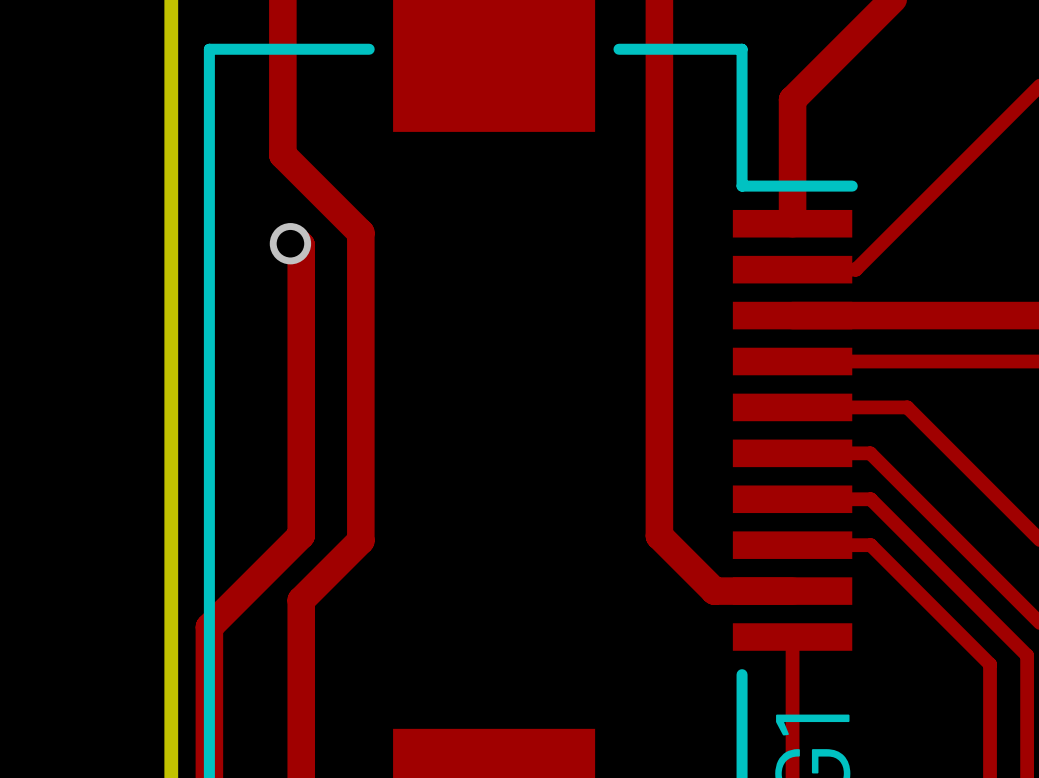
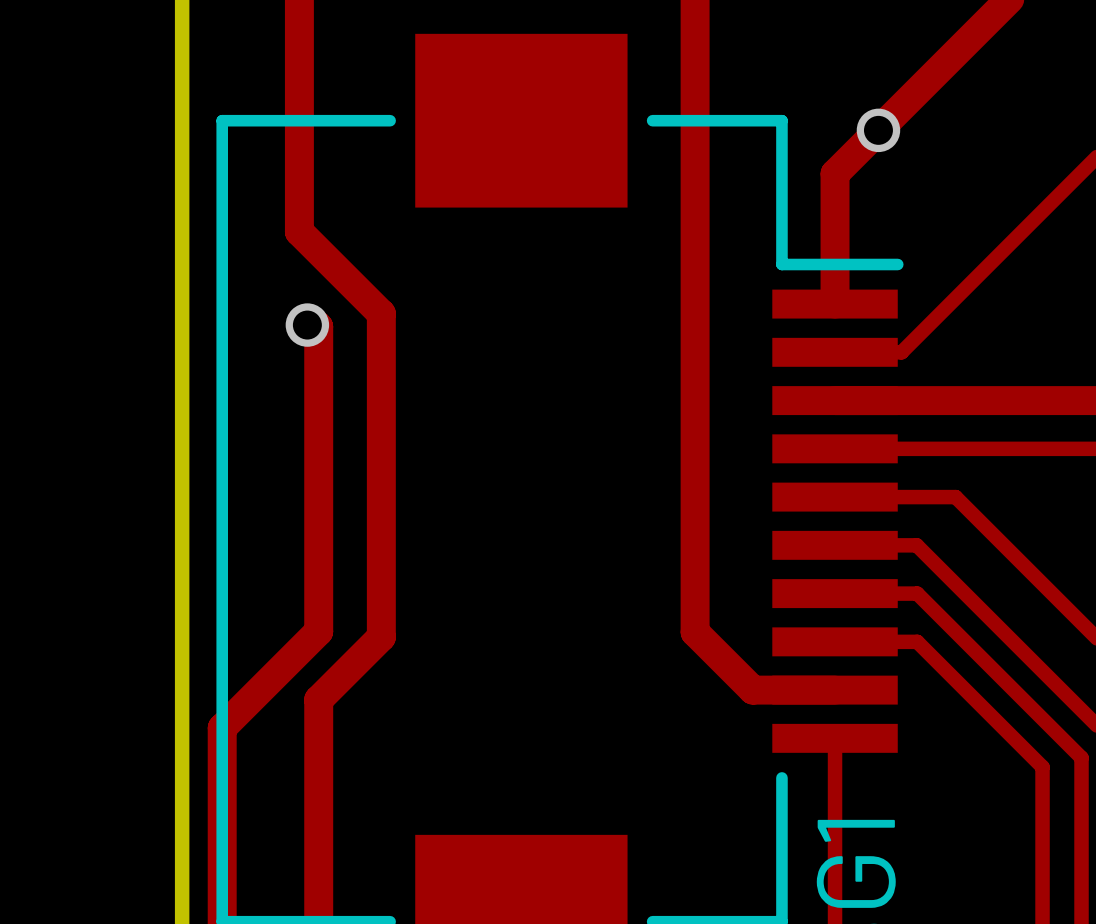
via: none -> (878, 130)

